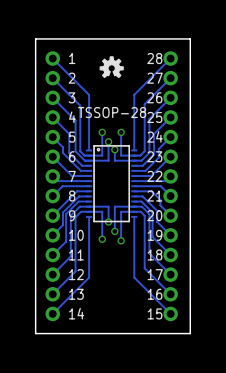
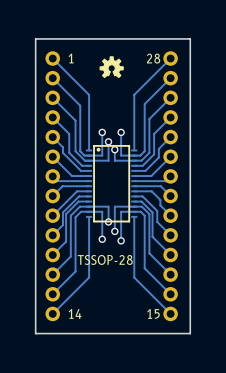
text: 2 (71, 78) -> none
text: 27 (155, 78) -> none
text: 3 (71, 97) -> none
text: 26 (154, 97) -> none
text position: TSSOP-28 (112, 112) -> TSSOP-28 (105, 259)
text: 4 (72, 117) -> none
text: 25 (154, 117) -> none
text: 24 (155, 136) -> none
text: 5 (72, 137) -> none
text: 6 (72, 156) -> none
text: 23 (154, 156) -> none
text: 7 (72, 176) -> none
text: 22 (154, 176) -> none
text: 8 (72, 196) -> none
text: 21 (154, 196) -> none
text: 9 (72, 215) -> none
text: 20 (154, 215) -> none
text: 10 (76, 235) -> none
text: 19 (155, 235) -> none
text: 11 (76, 254) -> none
text: 18 (155, 254) -> none
text: 12 (76, 274) -> none
text: 17 (155, 274) -> none
text: 13 (76, 294) -> none
text: 16 (155, 294) -> none

